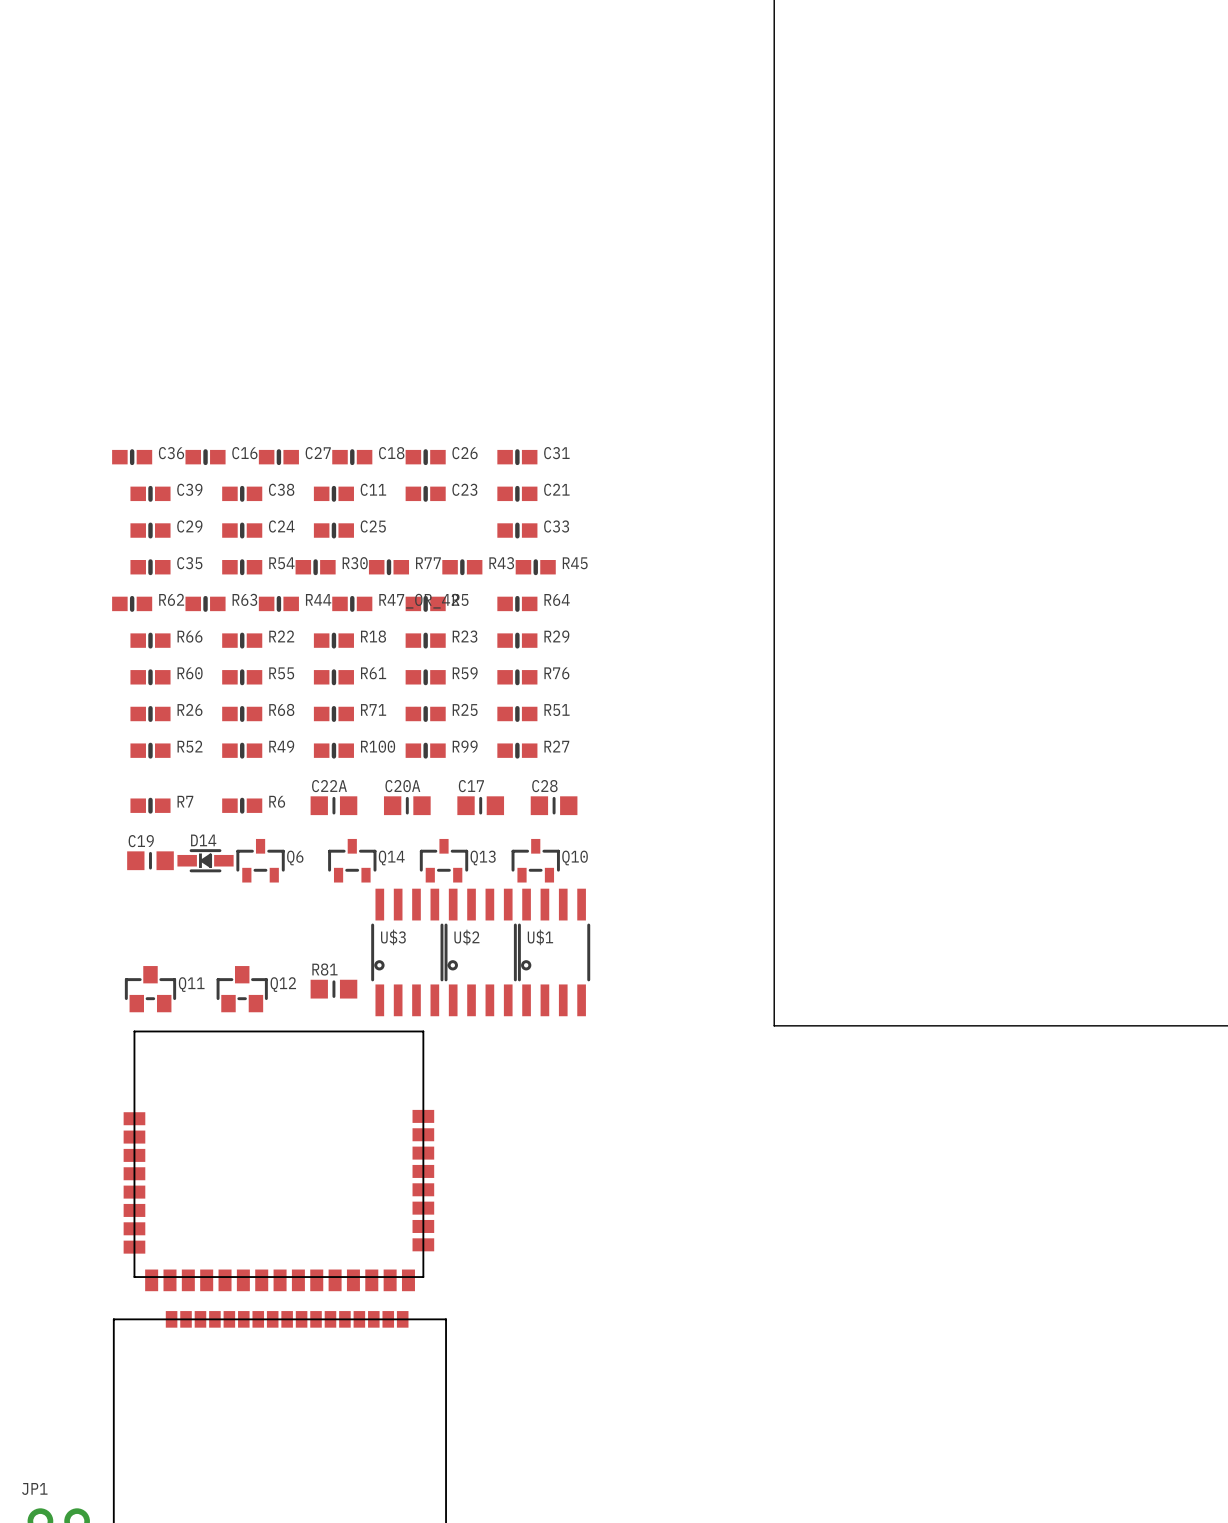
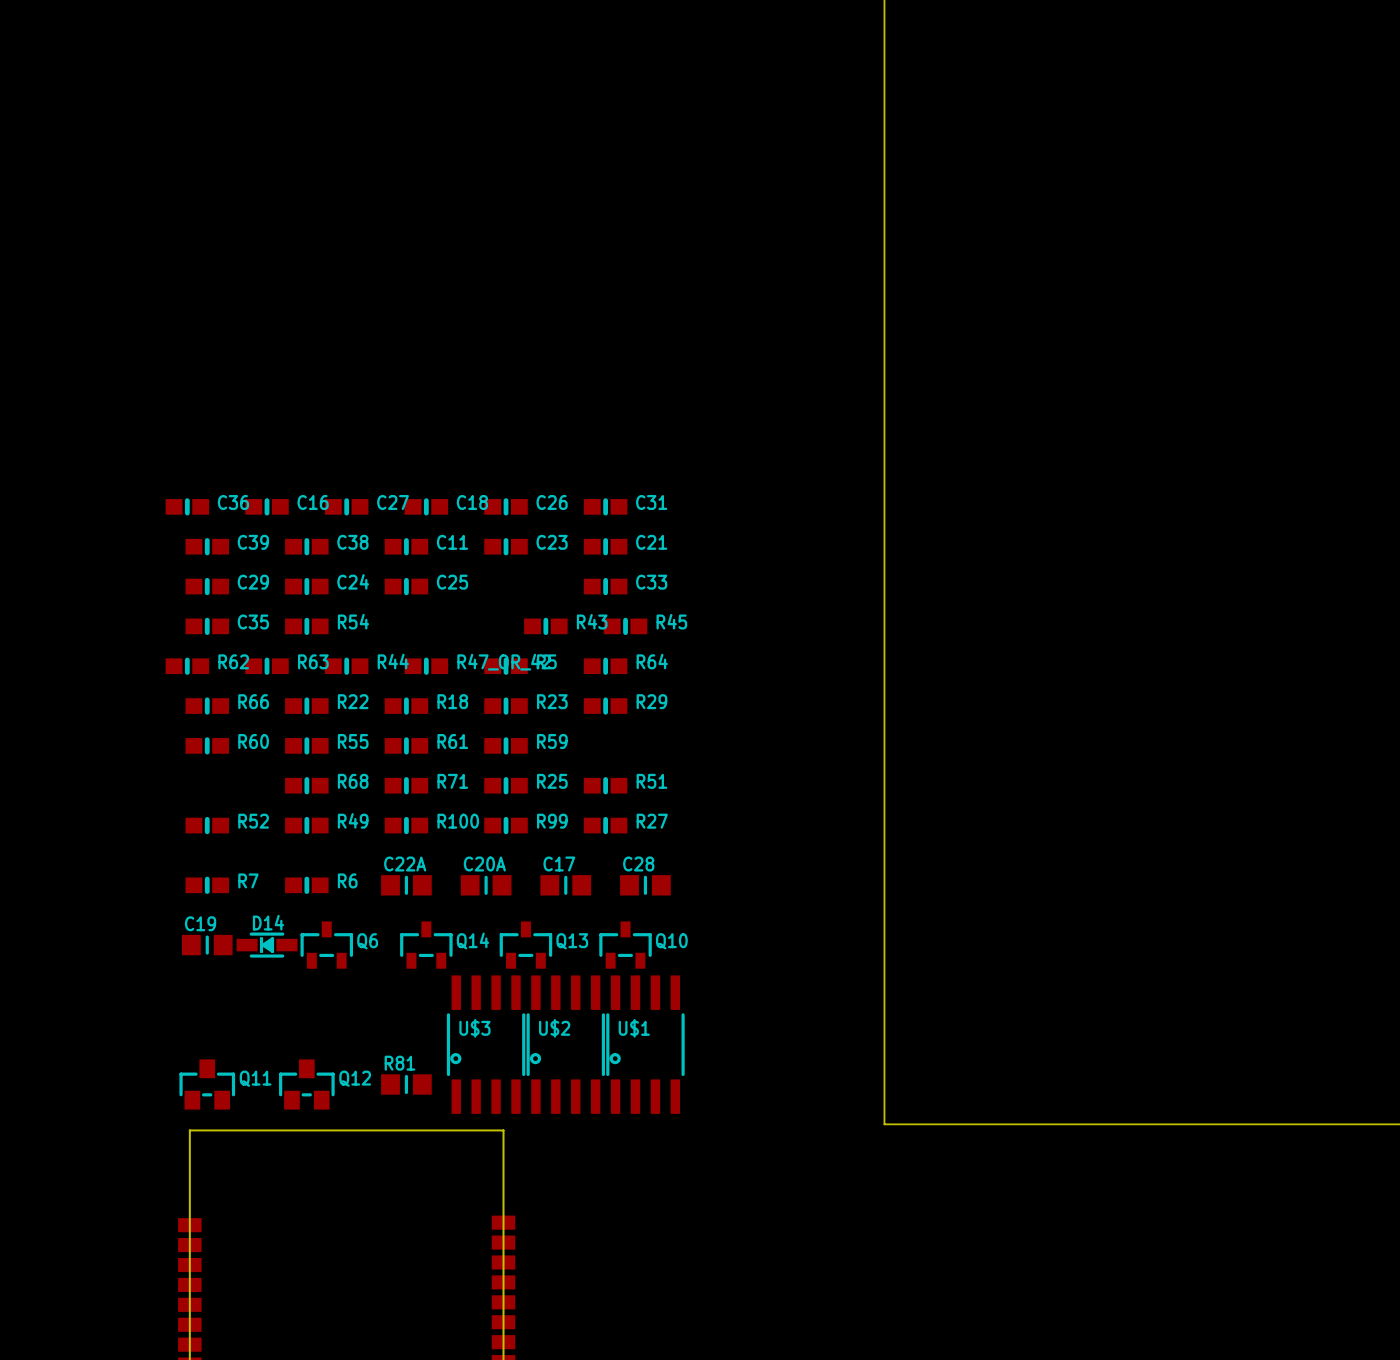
R30: (315, 567) -> none
R77: (388, 567) -> none
R76: (517, 677) -> none
R26: (150, 713) -> none

